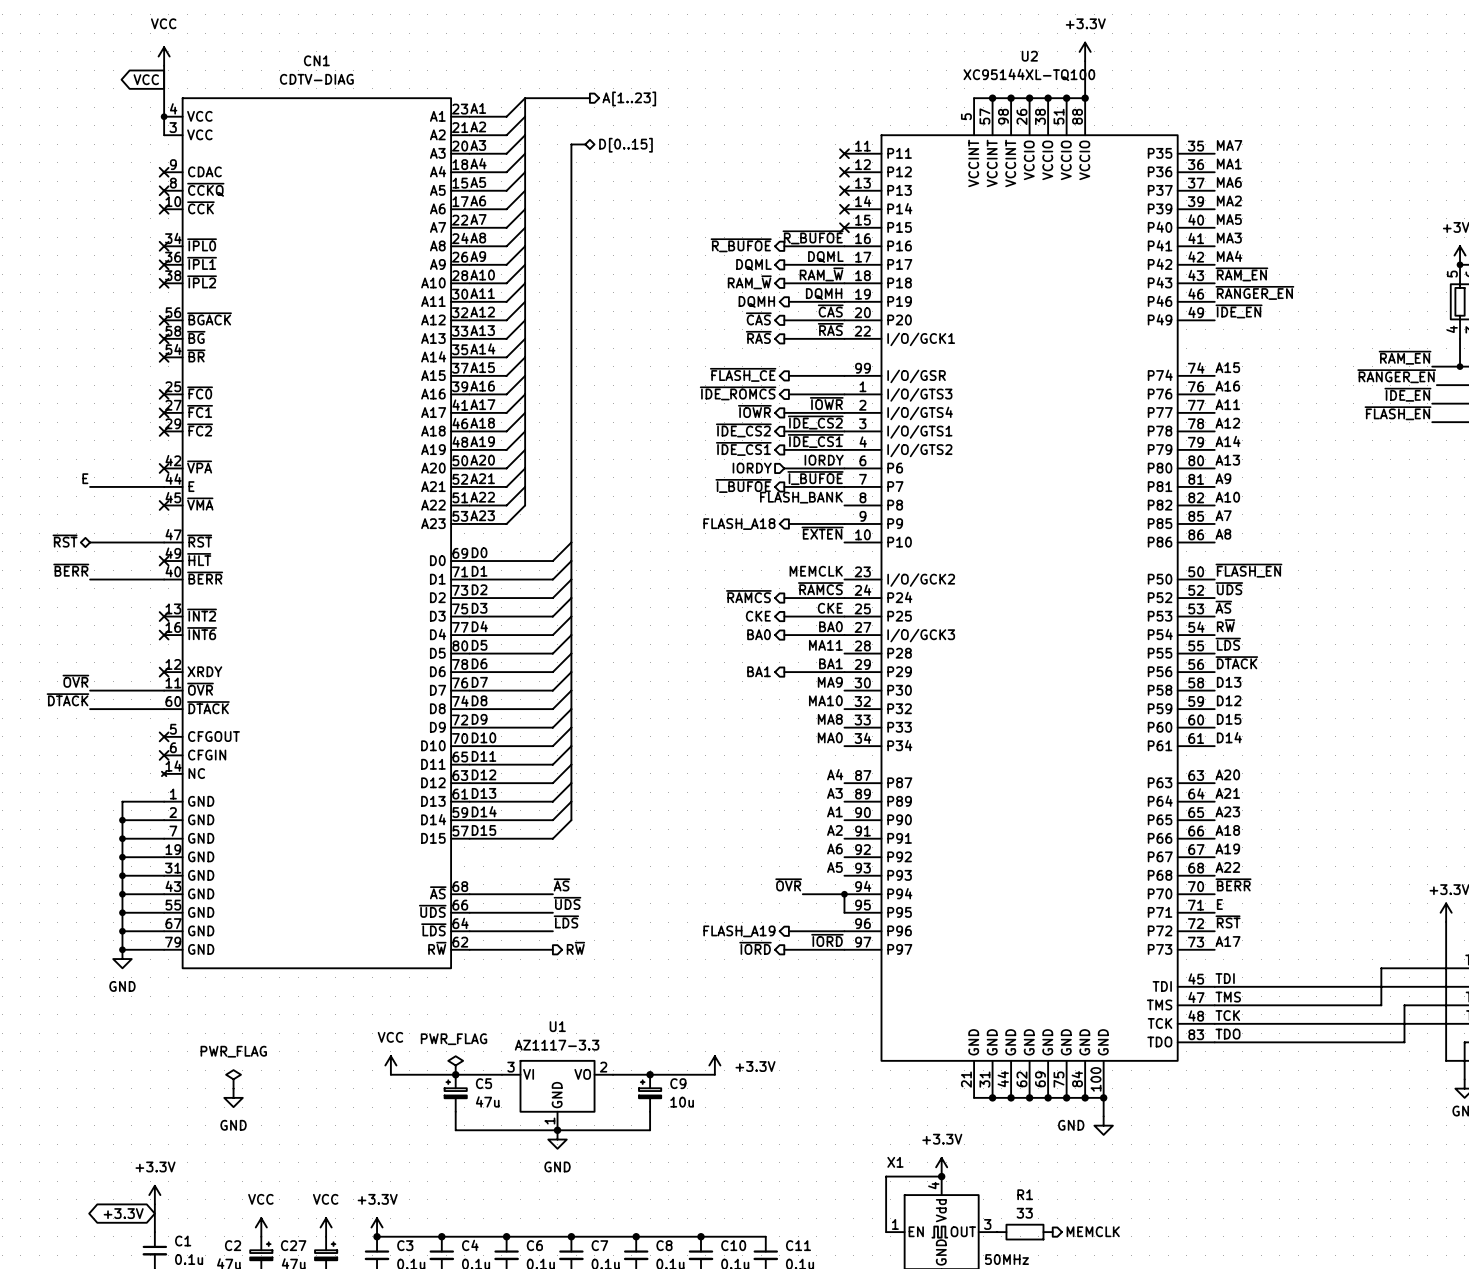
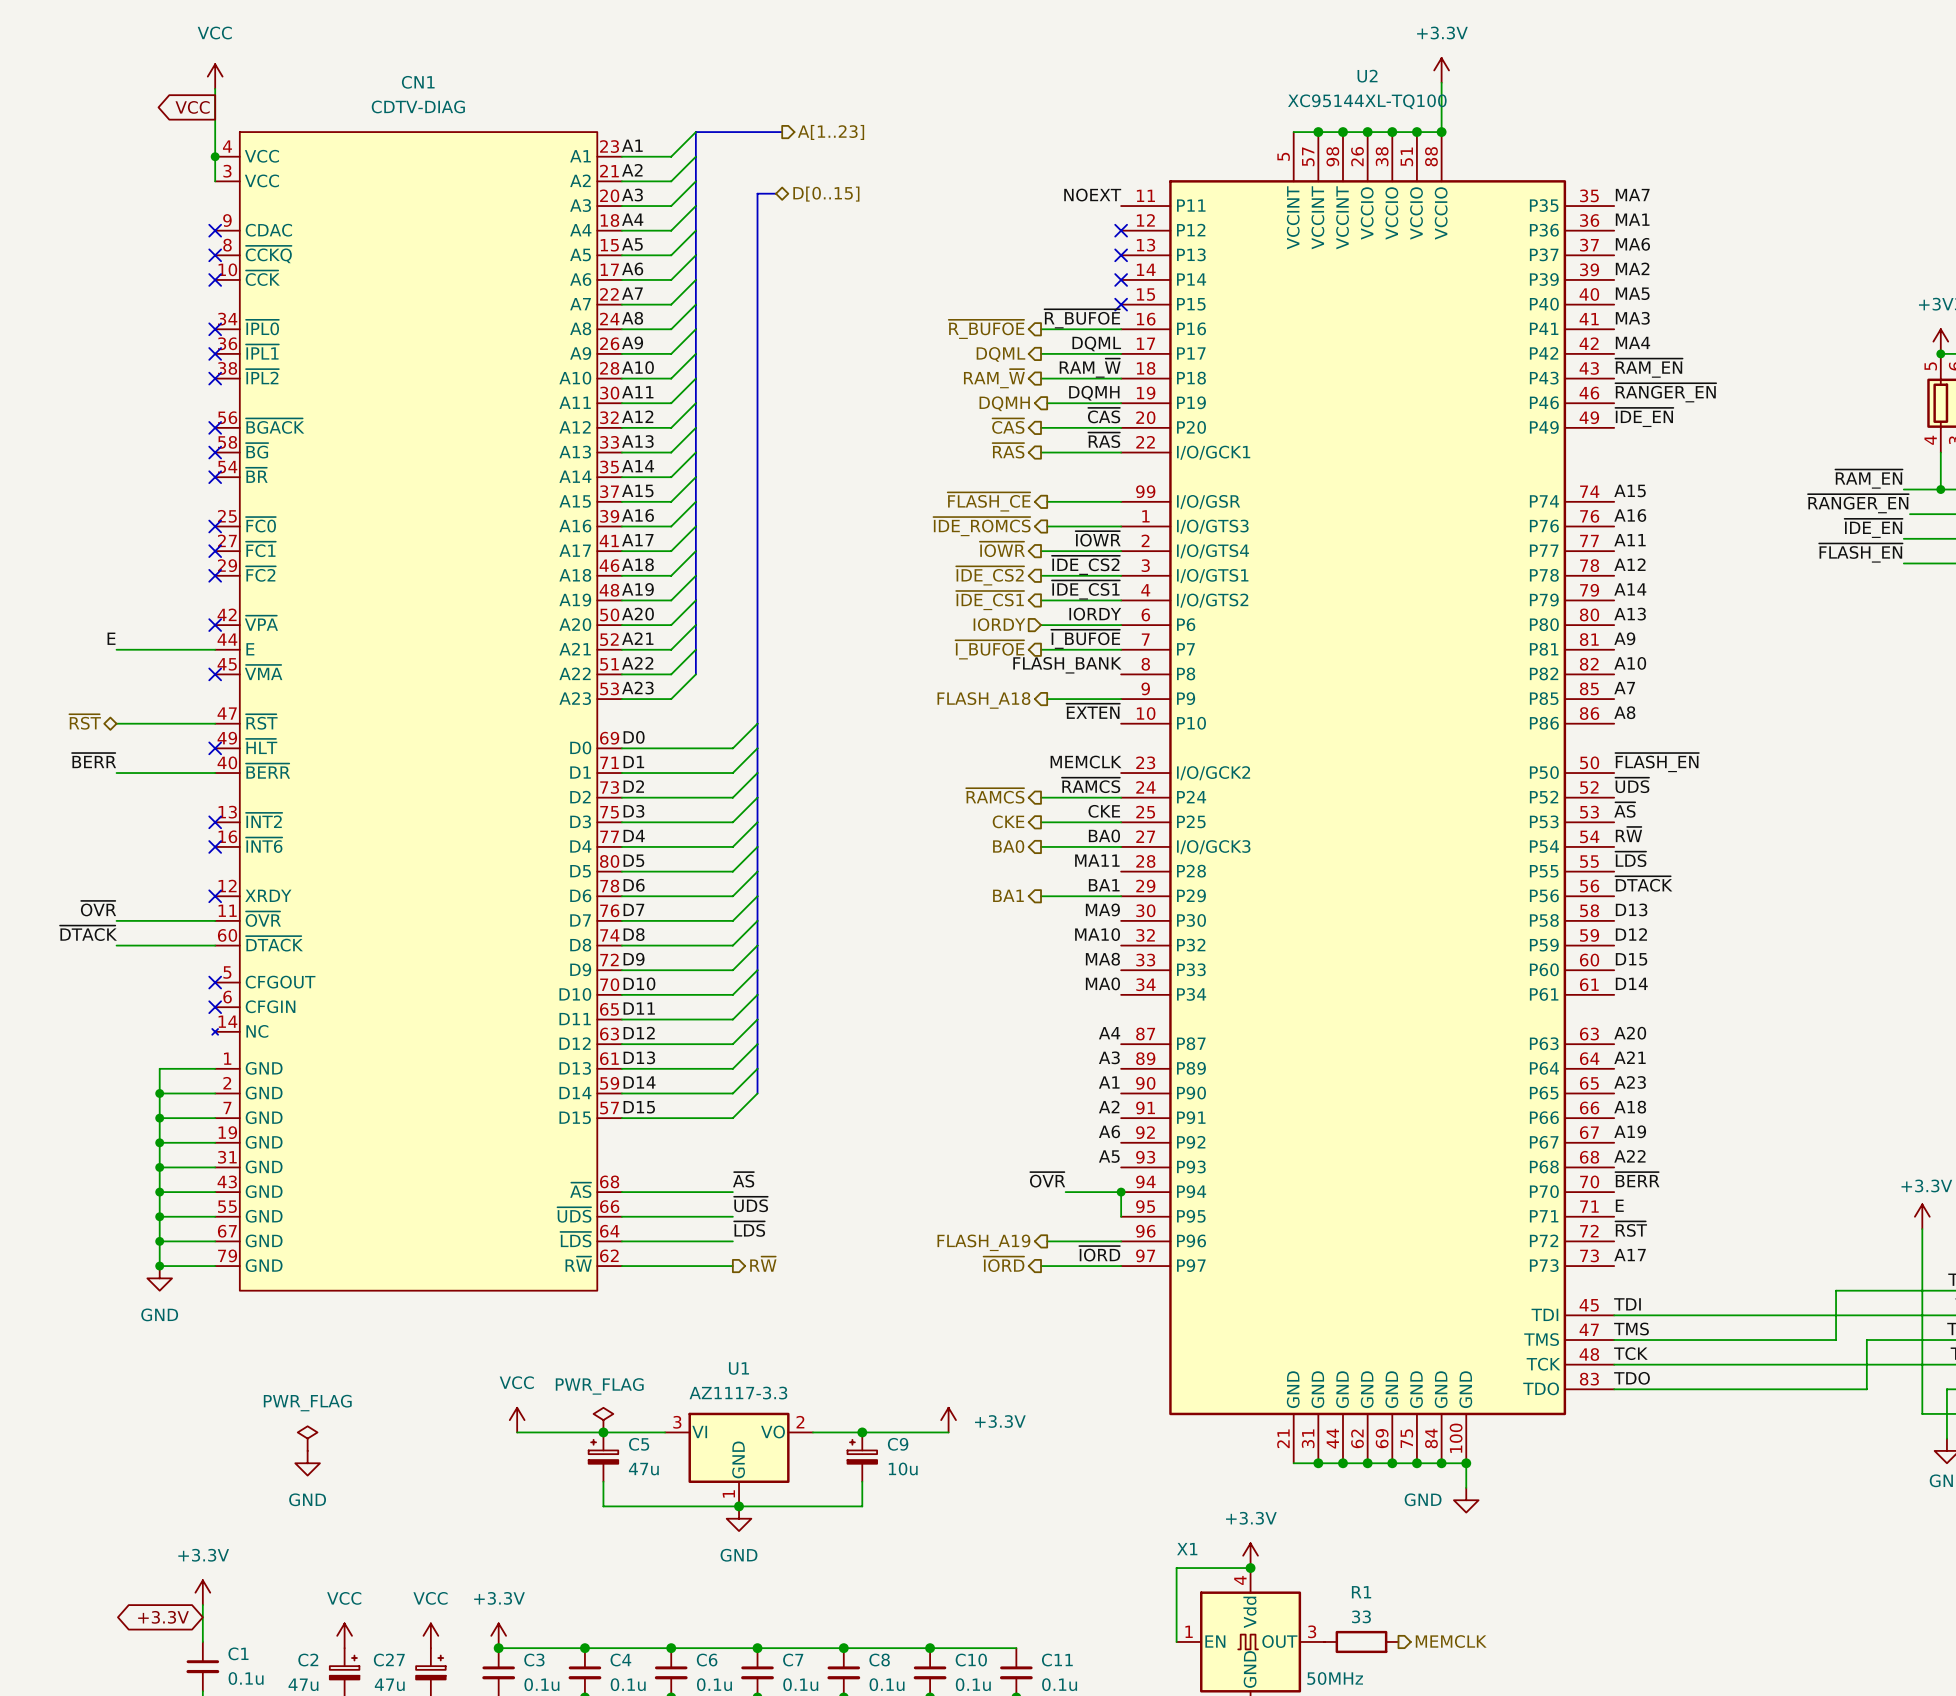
label: none -> NOEXT (1092, 195)
no-connect mark: (844, 153) -> none

